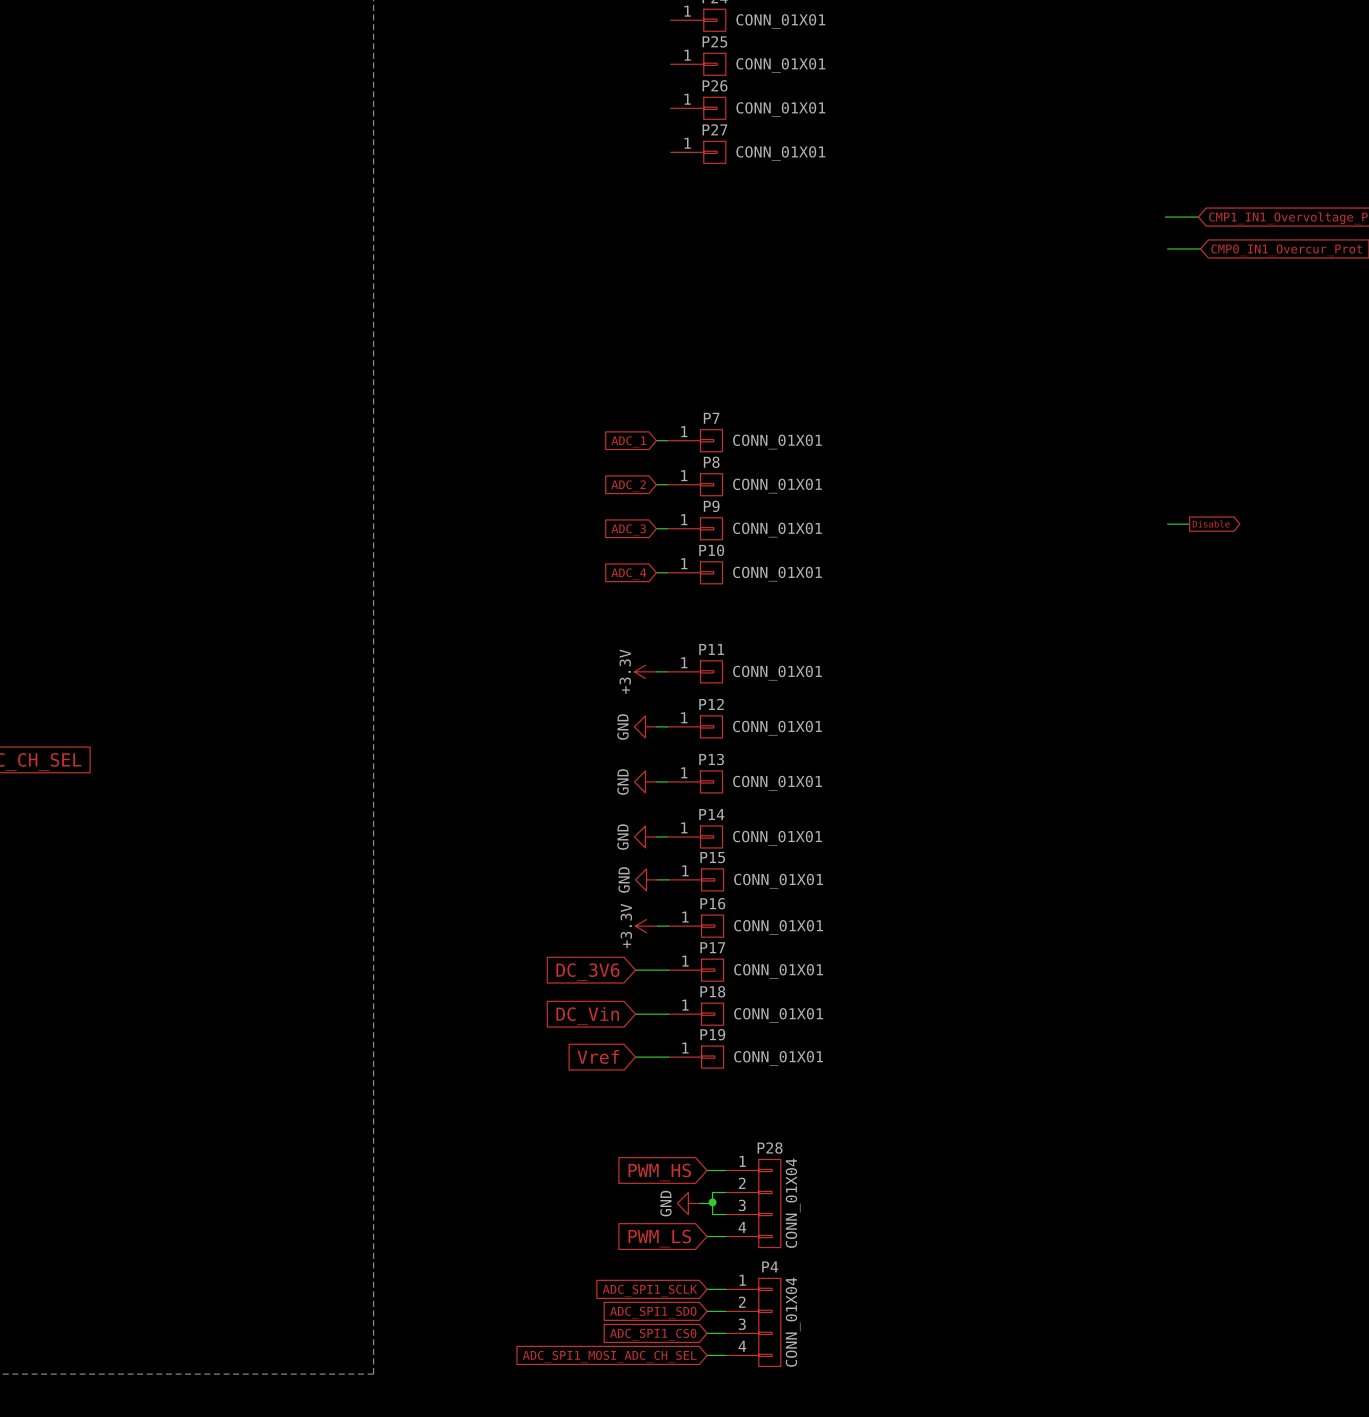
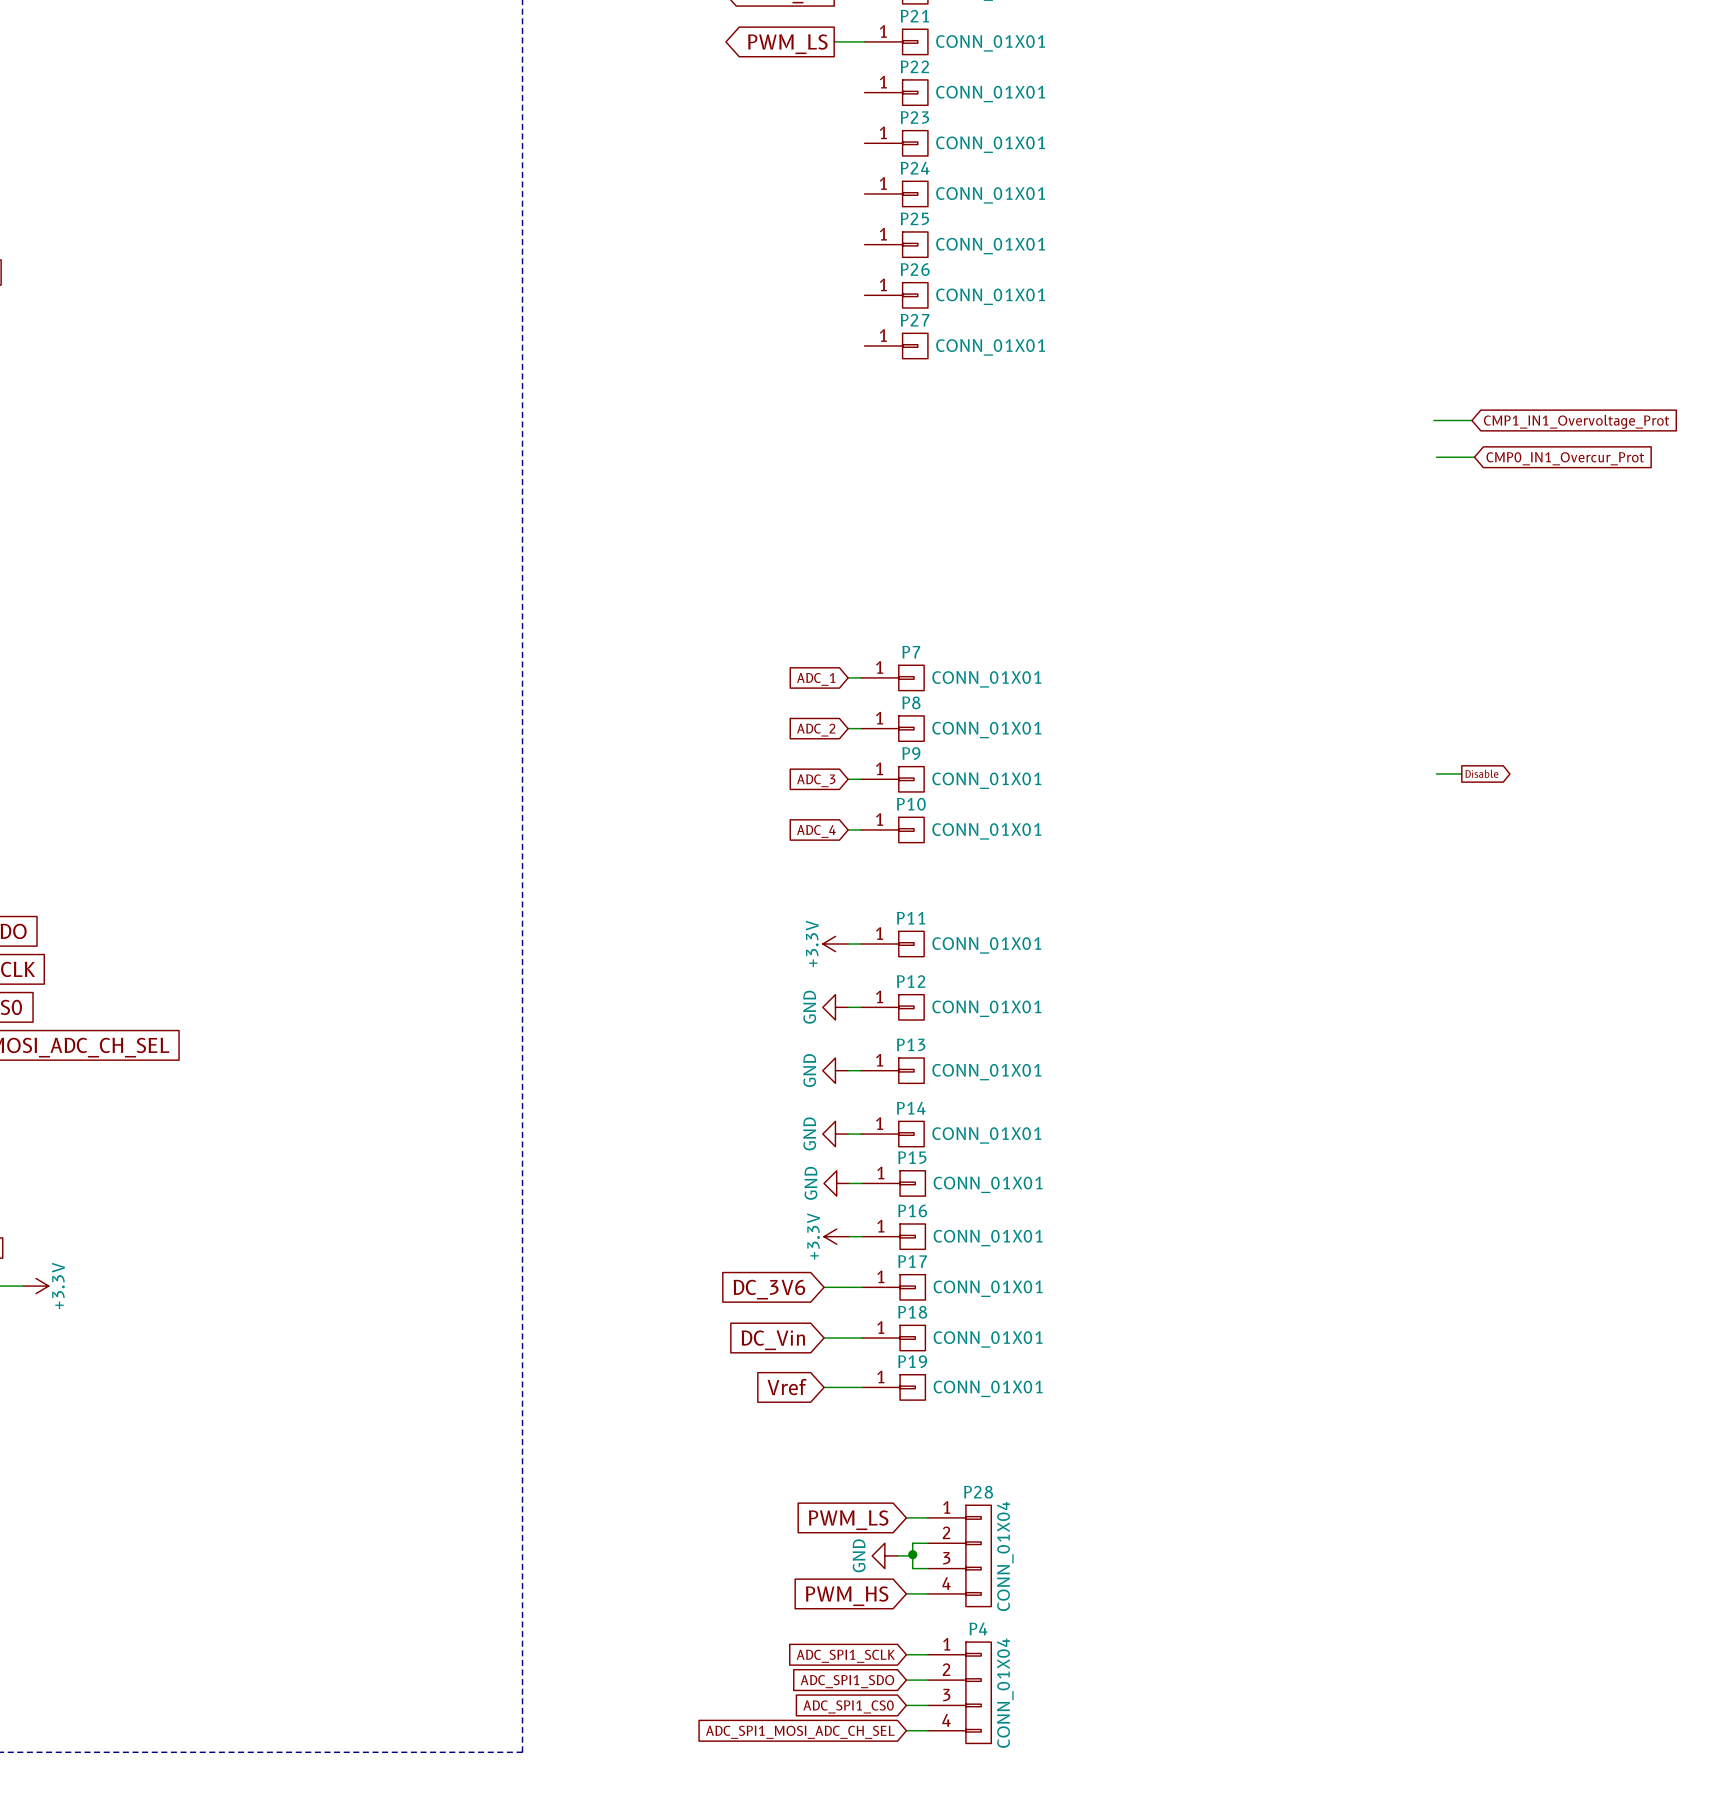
global label: PWM_HS (659, 1172) -> PWM_LS (848, 1520)
global label: PWM_LS (659, 1238) -> PWM_HS (847, 1596)

